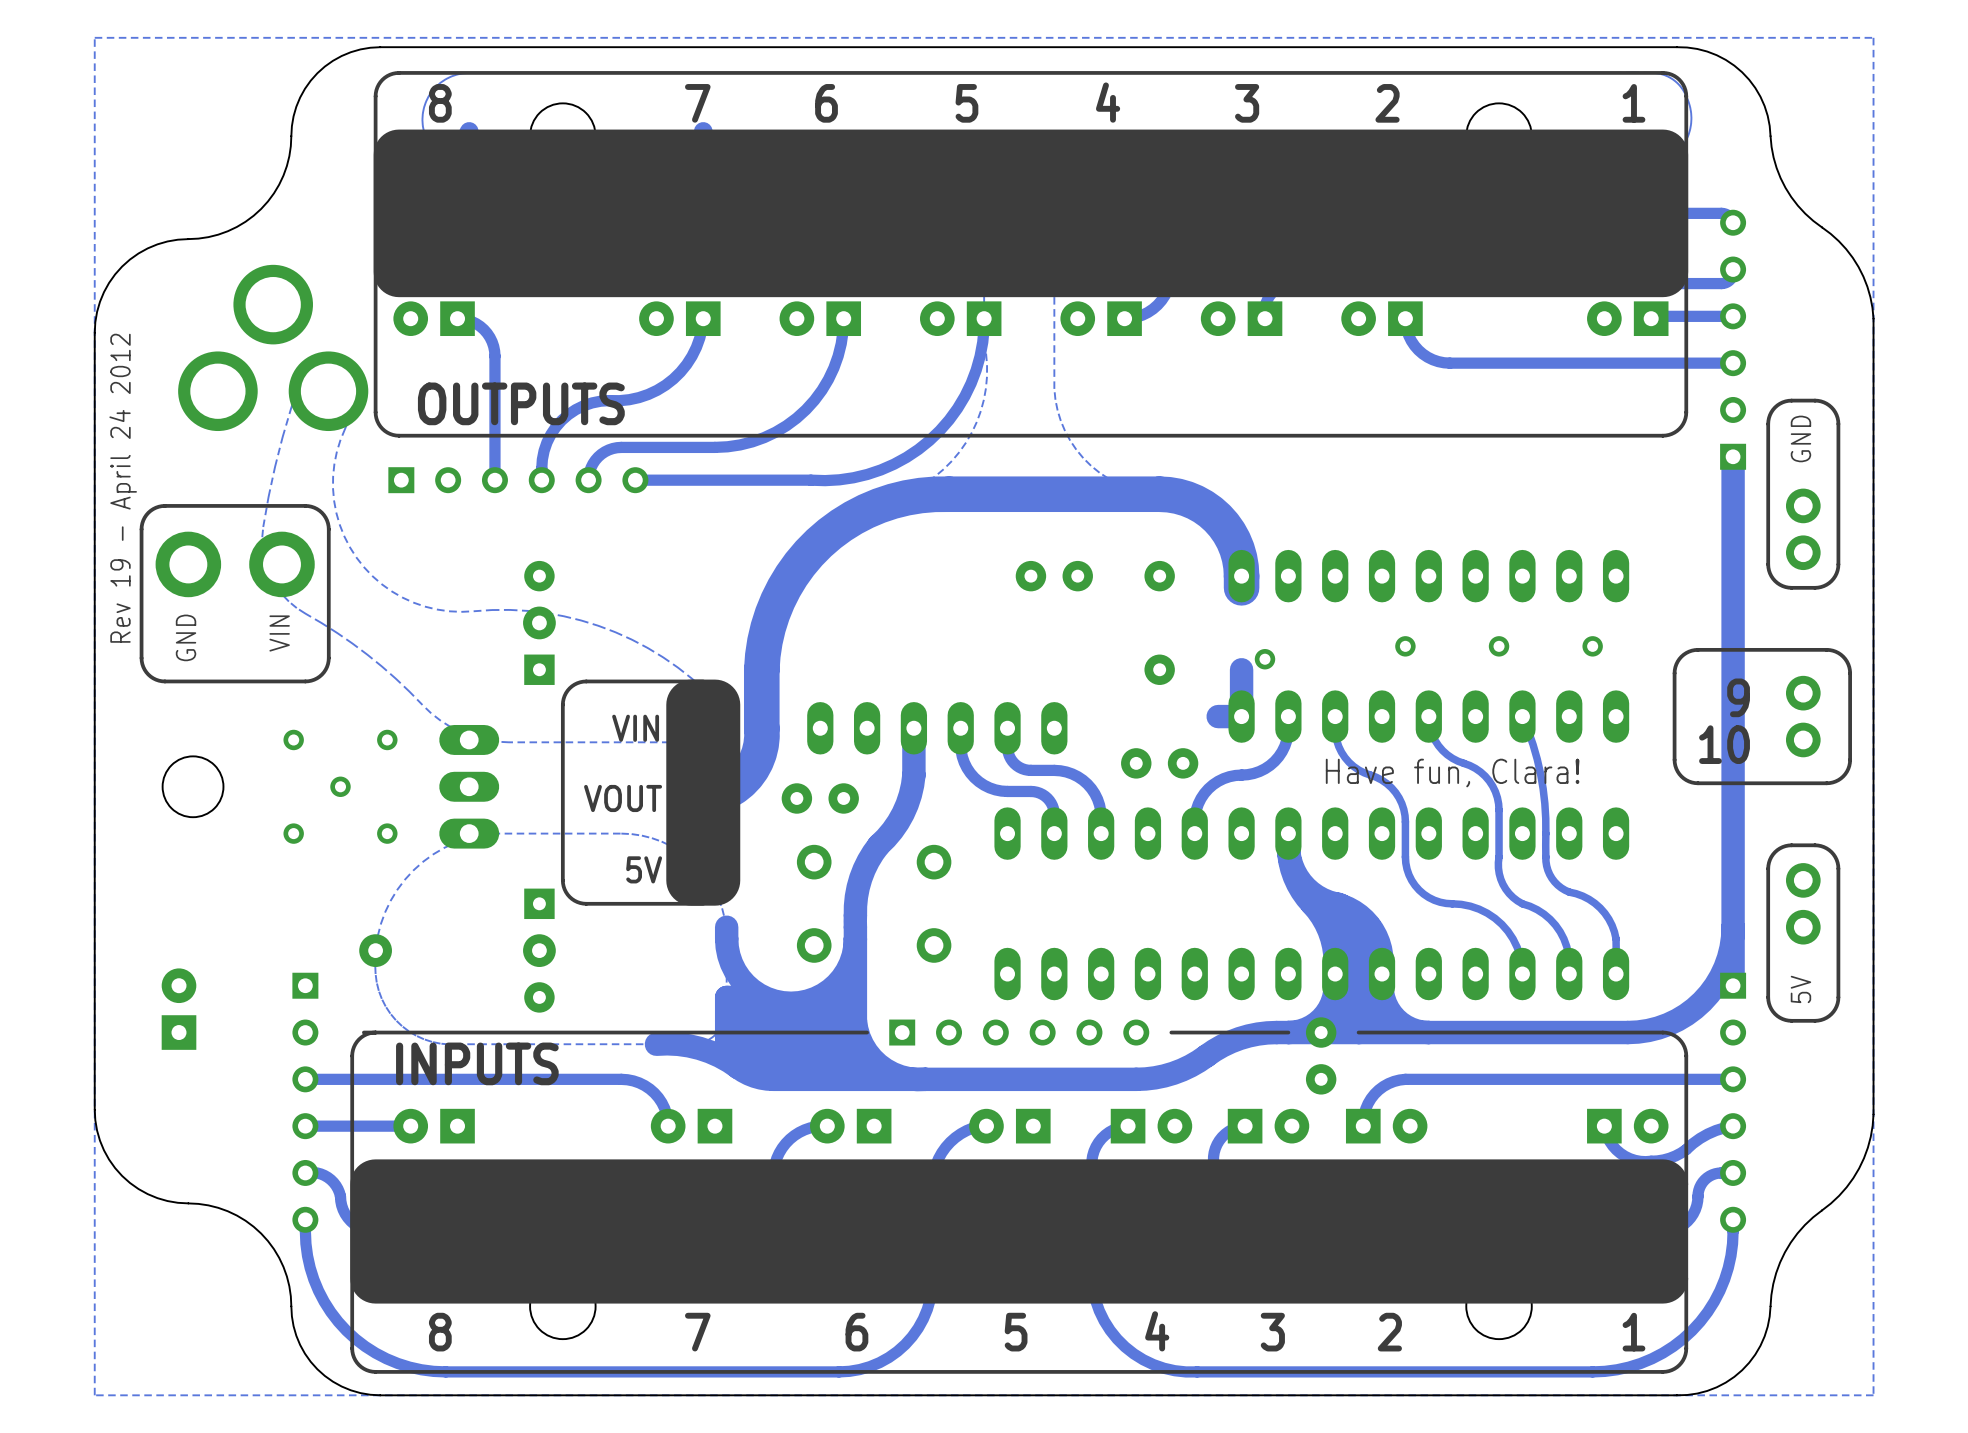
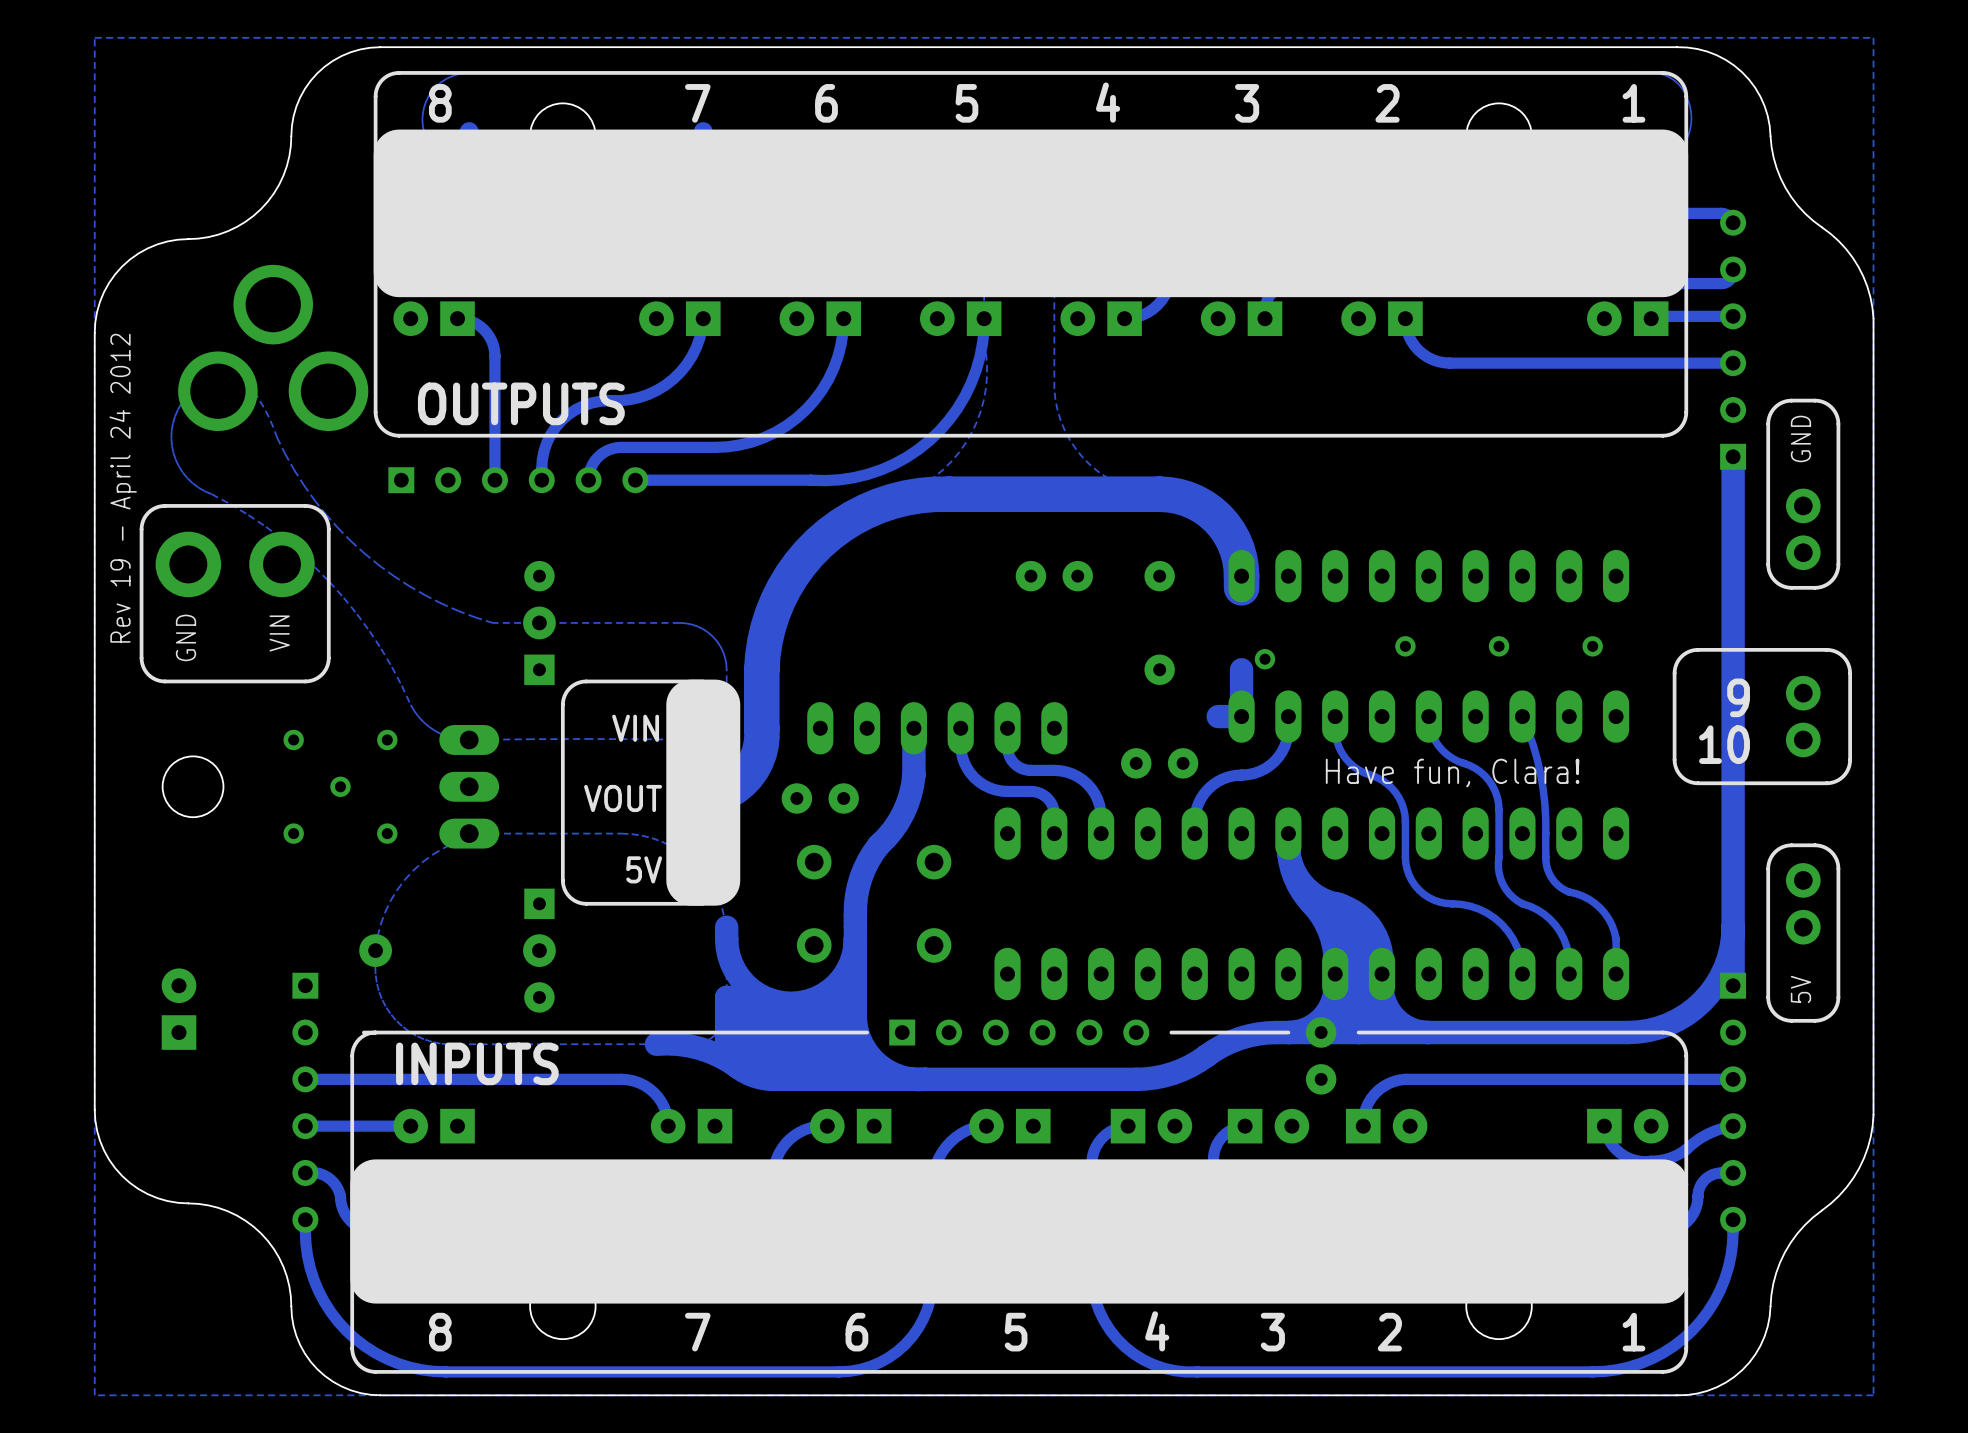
zone outline: (318, 387) (301, 393) (292, 404) (275, 466) (263, 526) (262, 547) (266, 567) (275, 585) (288, 601) (367, 654) (440, 720) (473, 736) (509, 742) (705, 742) (717, 735) (722, 726) (724, 716) (722, 706) (717, 697) (663, 657) (631, 639) (581, 620) (545, 613) (509, 609) (449, 611) (425, 606) (402, 597) (372, 576) (356, 557) (344, 536) (334, 500) (334, 463) (347, 421) (346, 407) (335, 392) (318, 387) -> (230, 376) (244, 379) (257, 397) (294, 470) (326, 514) (351, 541) (379, 565) (425, 595) (458, 610) (492, 622) (679, 622) (697, 626) (708, 632) (720, 646) (726, 663) (726, 719) (721, 731) (713, 737) (703, 739) (469, 739) (447, 736) (428, 726) (414, 711) (391, 667) (369, 631) (329, 582) (282, 539) (248, 515) (198, 487) (187, 478) (178, 466) (173, 452) (171, 438) (172, 423) (177, 410) (185, 397) (196, 388) (216, 378) (230, 376)

